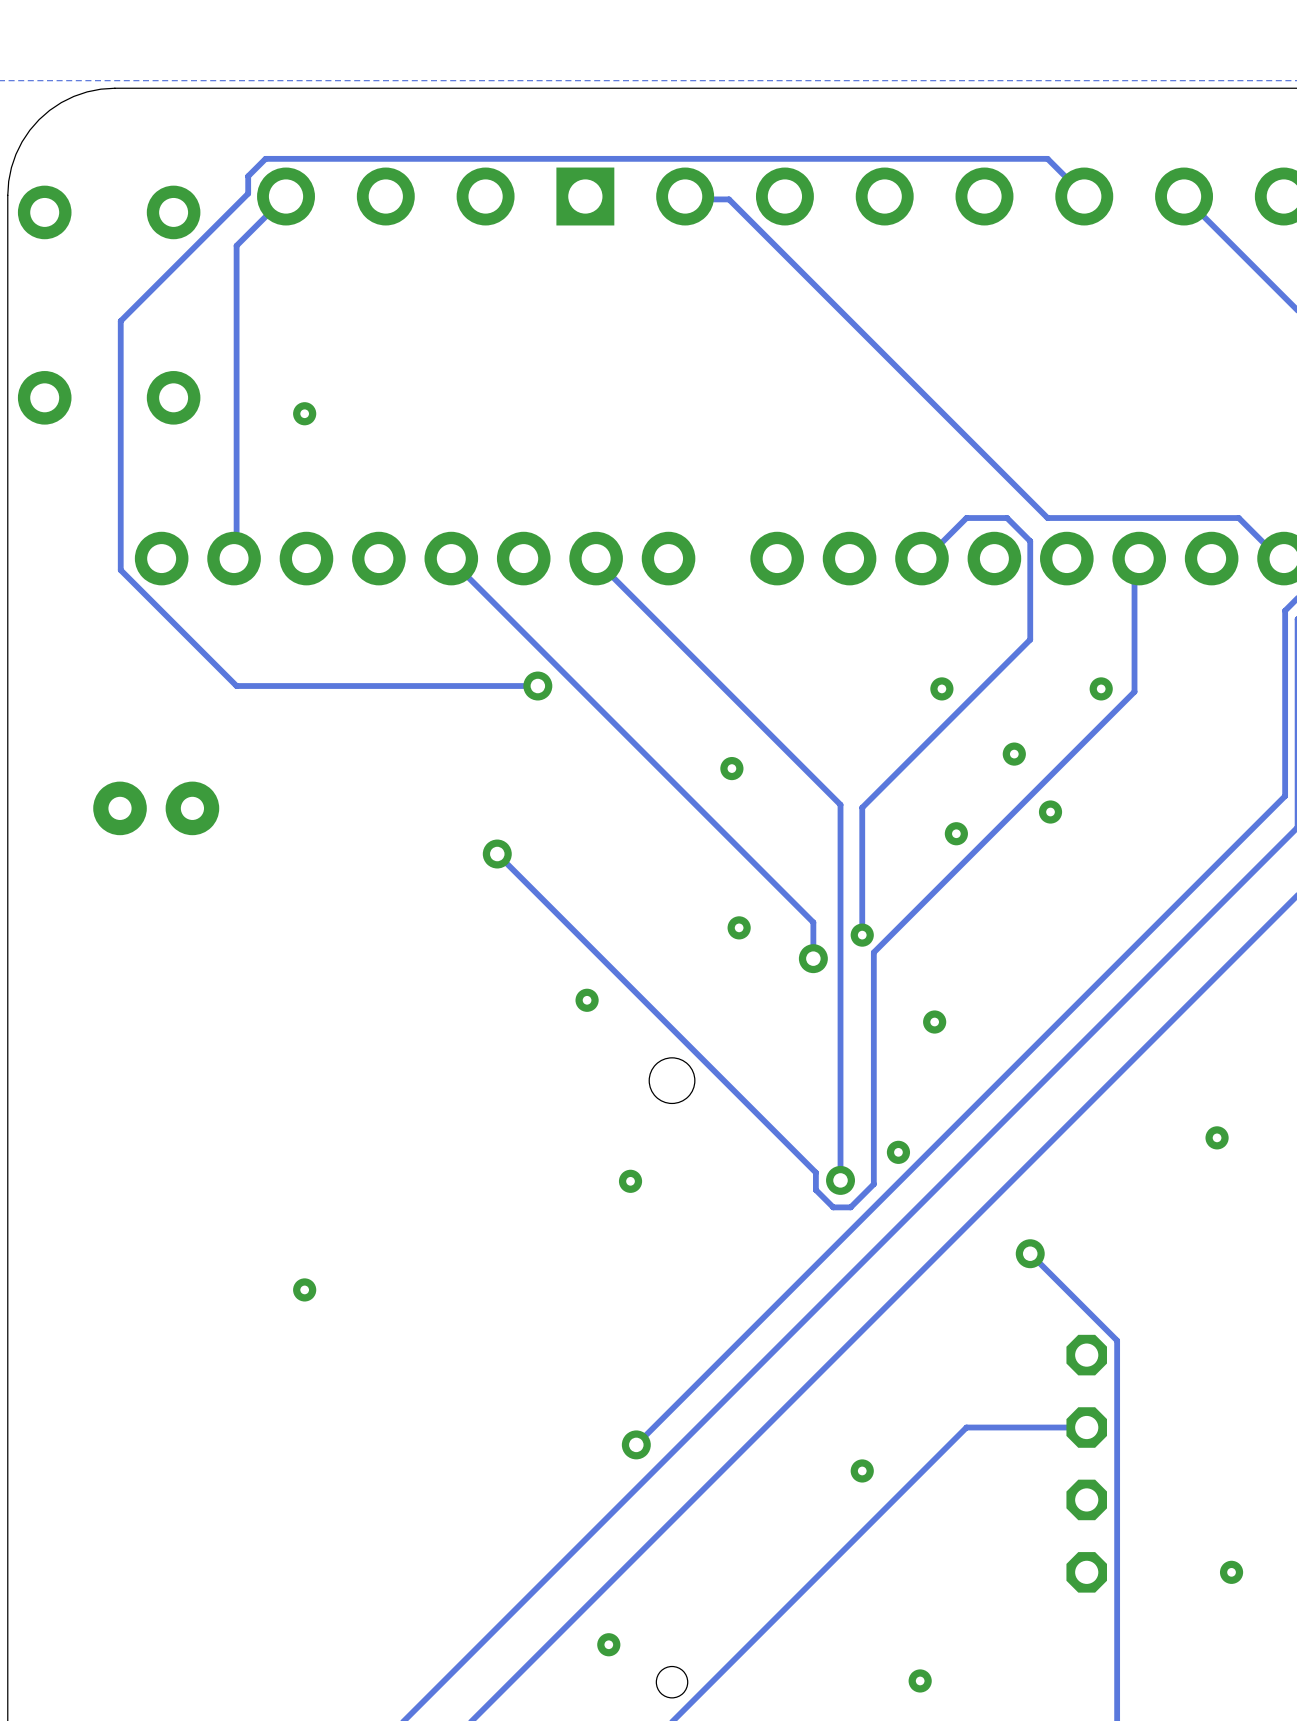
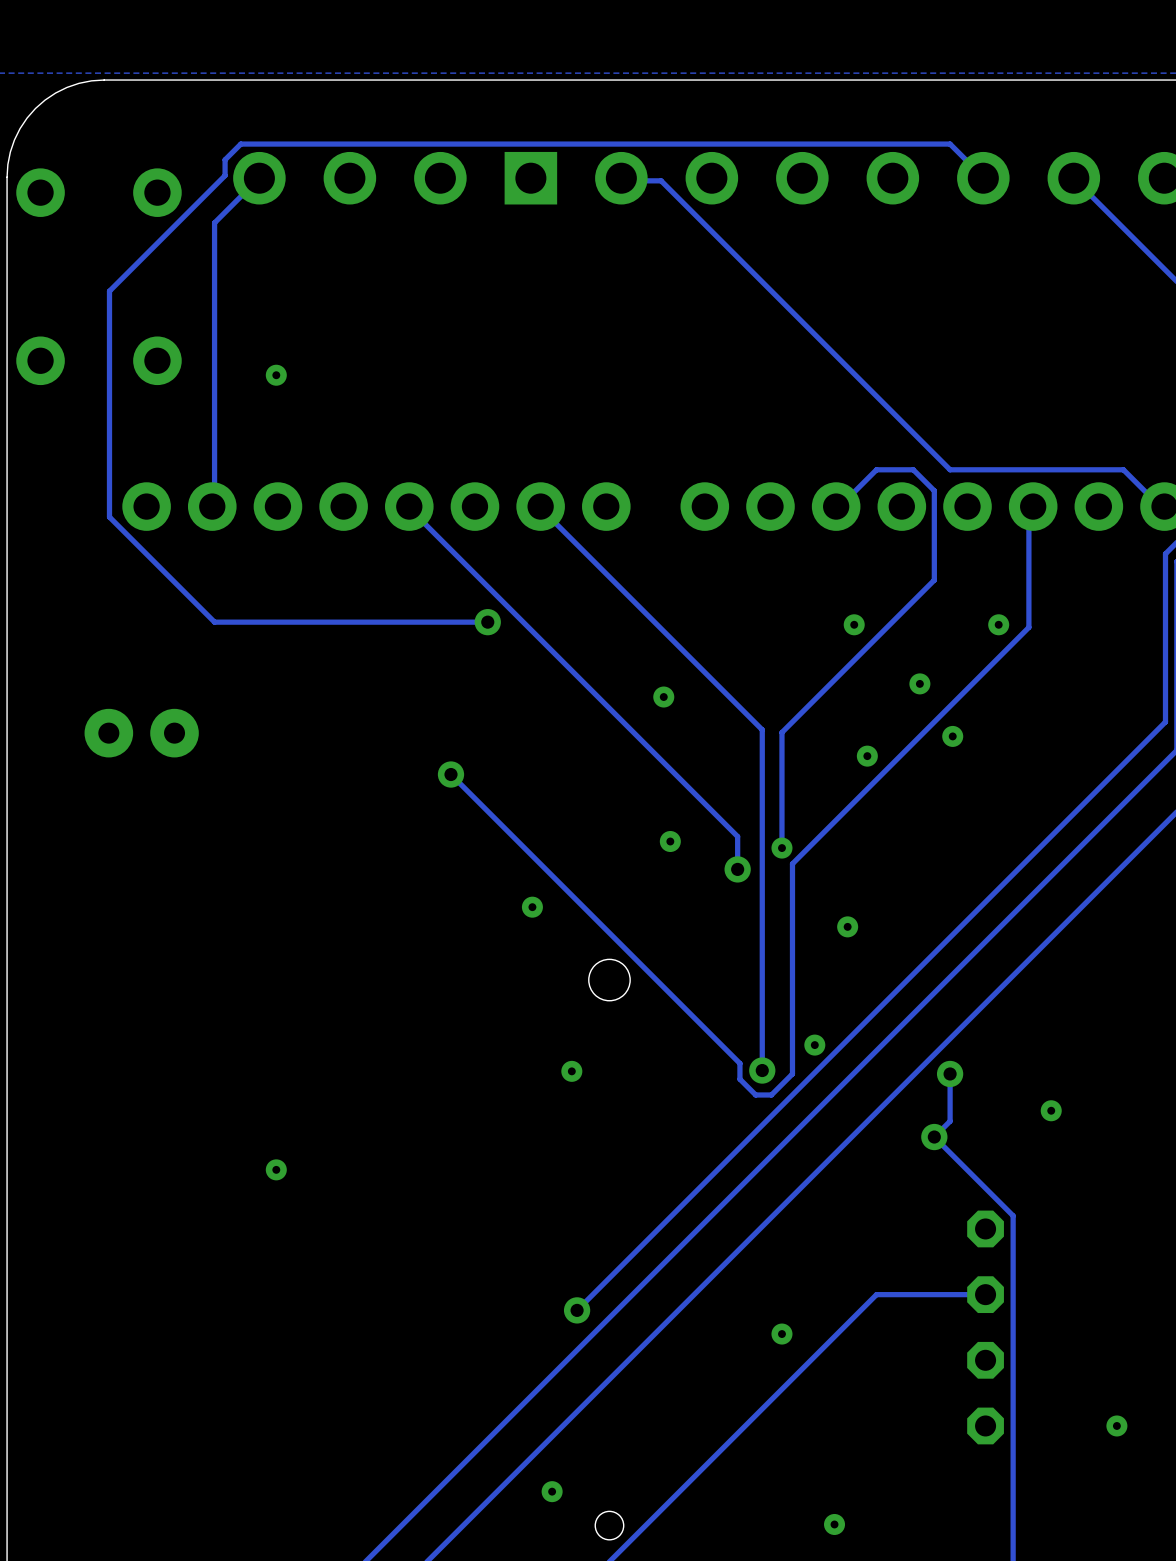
via position: (1217, 1137) -> (1051, 1110)
track: none -> (950, 1073) (950, 1121) (934, 1137)
via: none -> (950, 1073)

